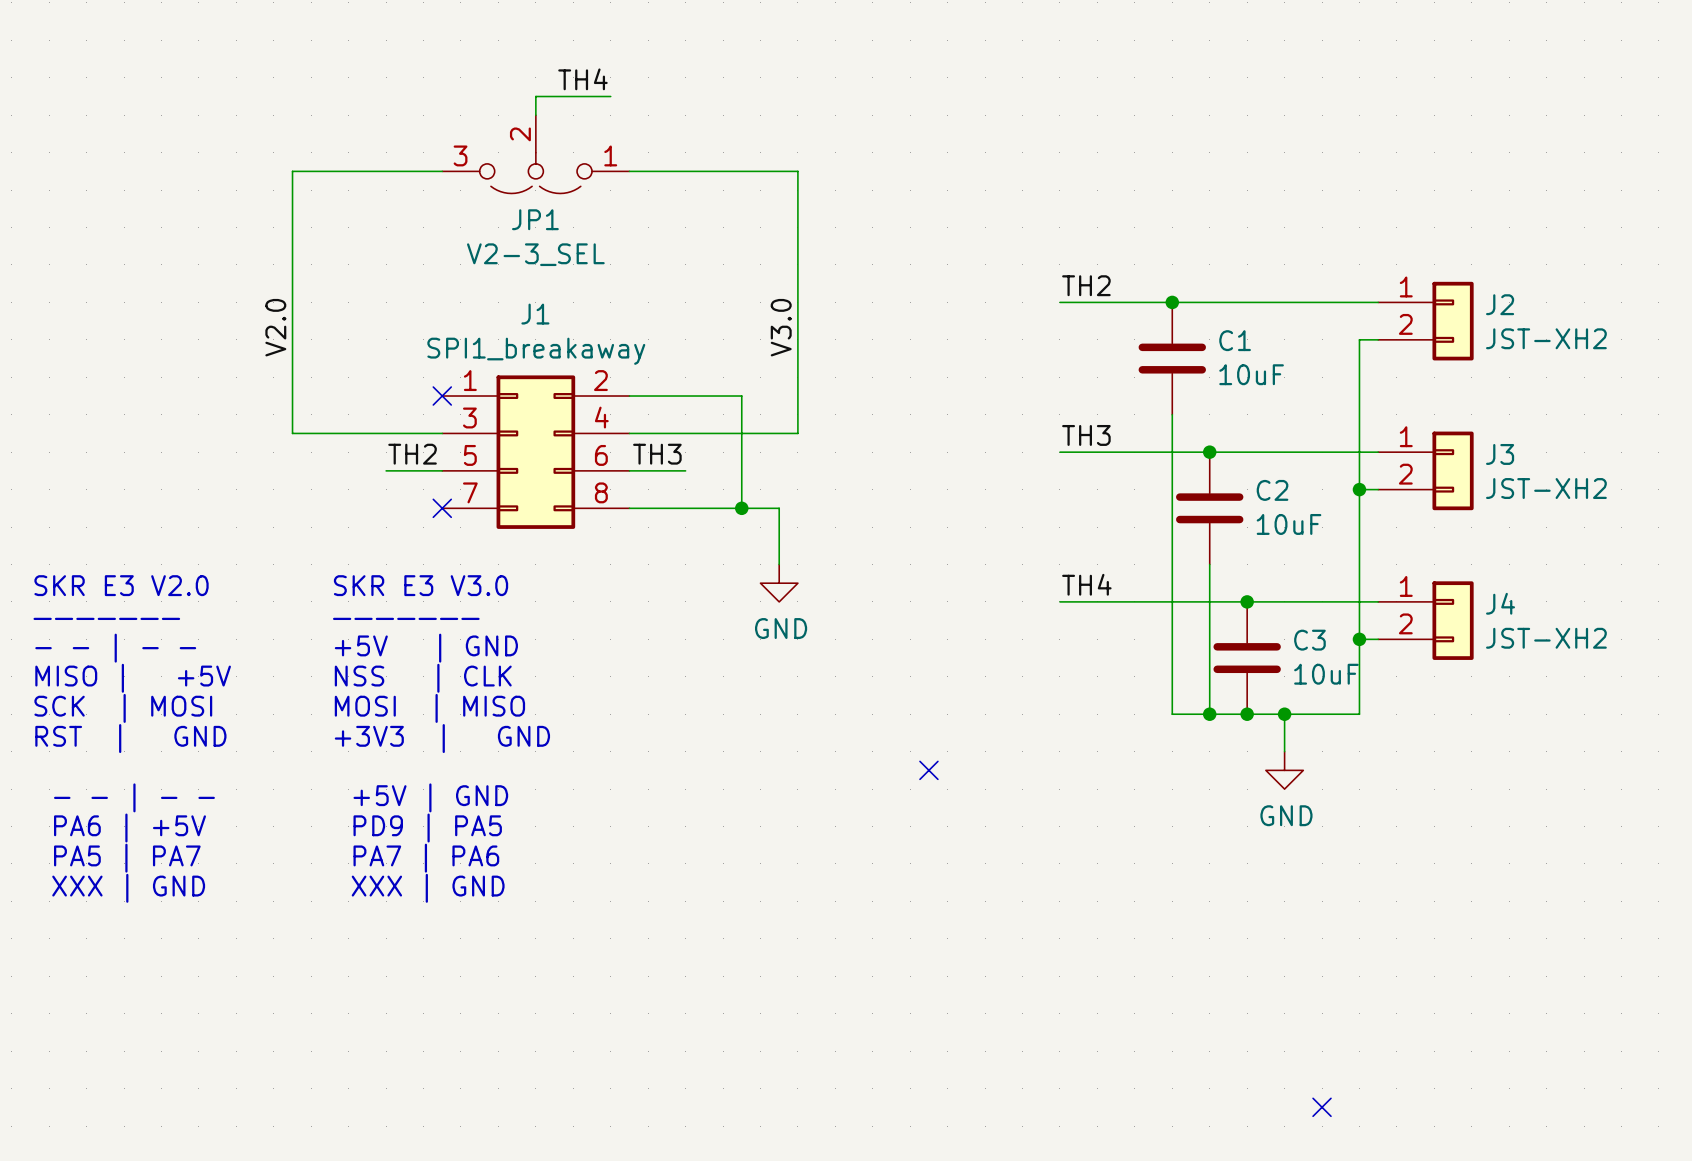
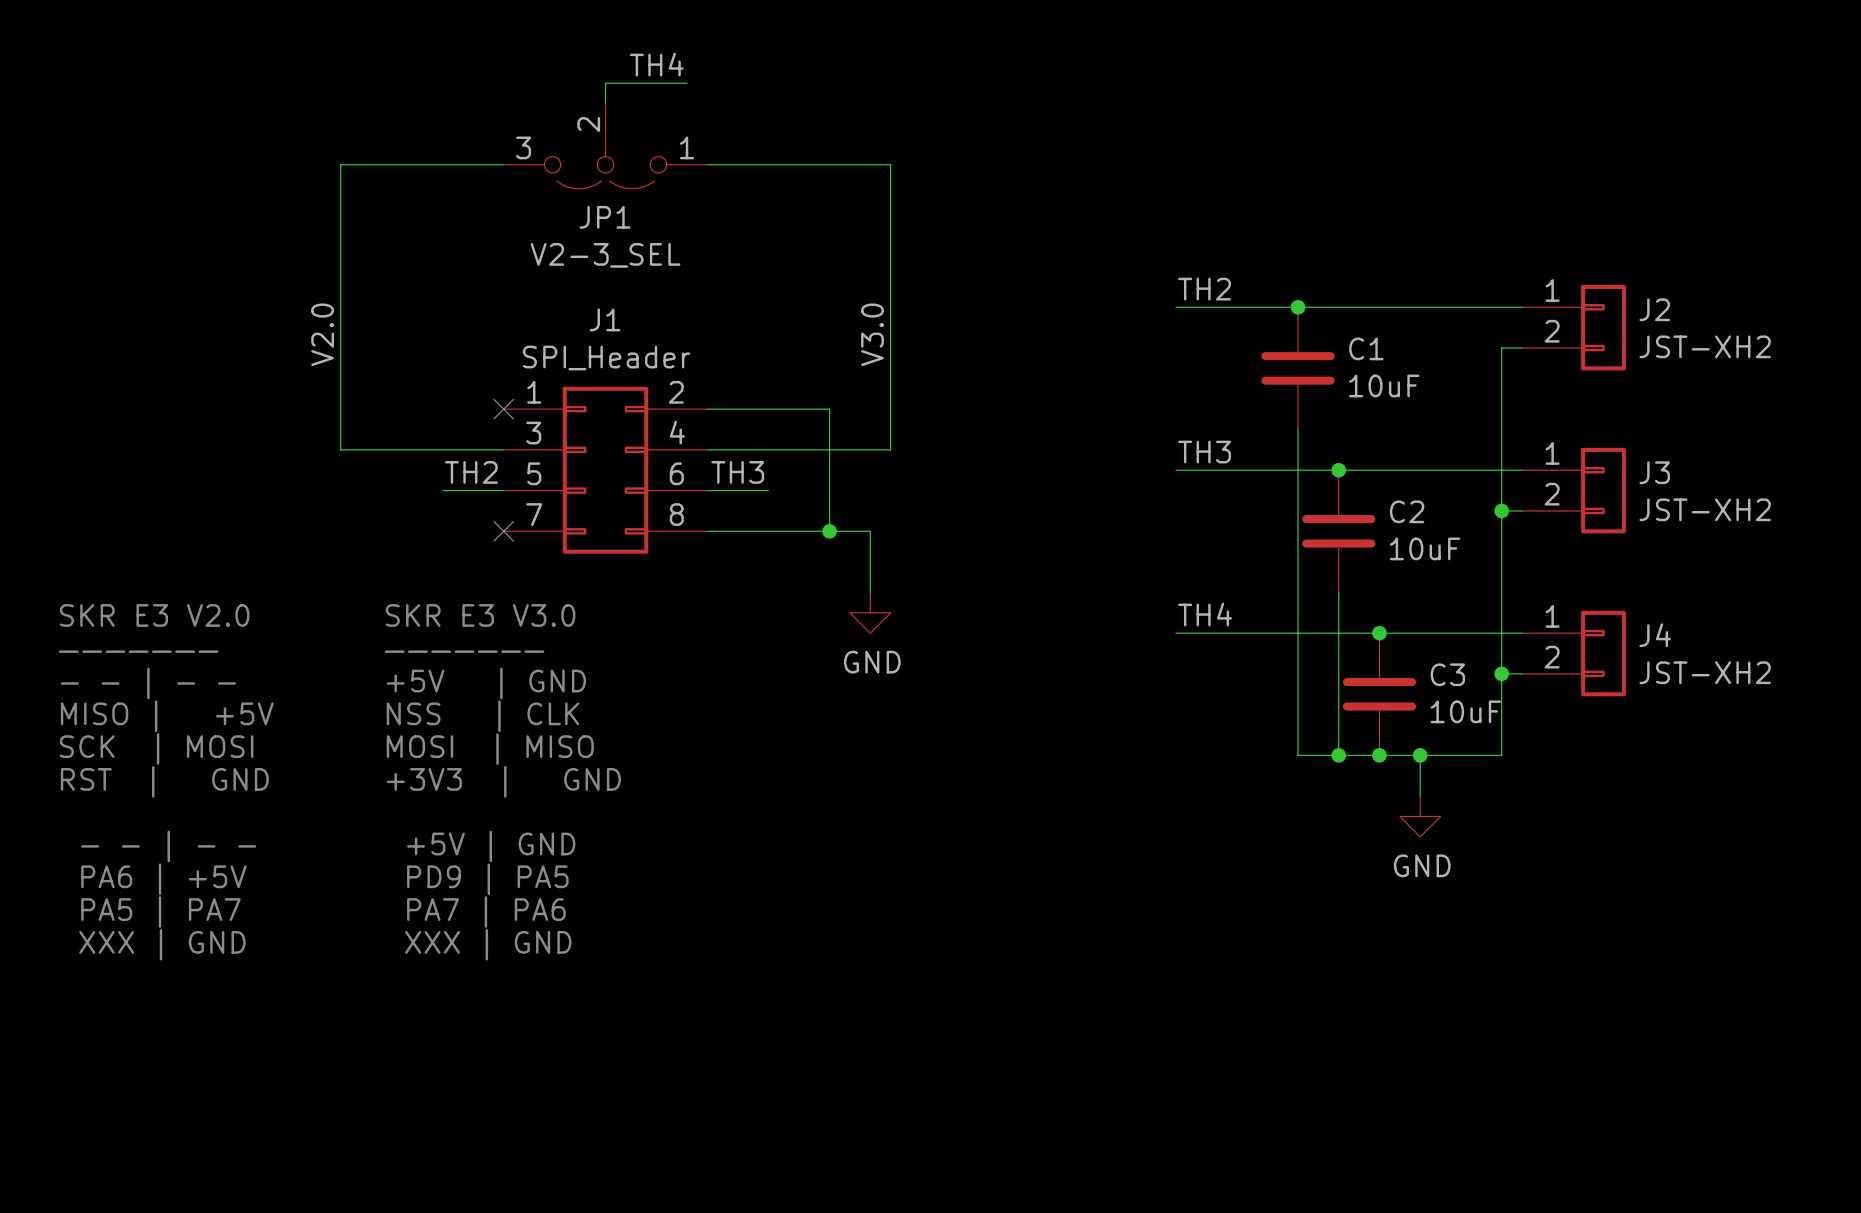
J1 value: SPI1_breakaway (536, 351) -> SPI_Header (606, 358)
no-connect mark: (928, 770) -> none
no-connect mark: (1322, 1107) -> none

